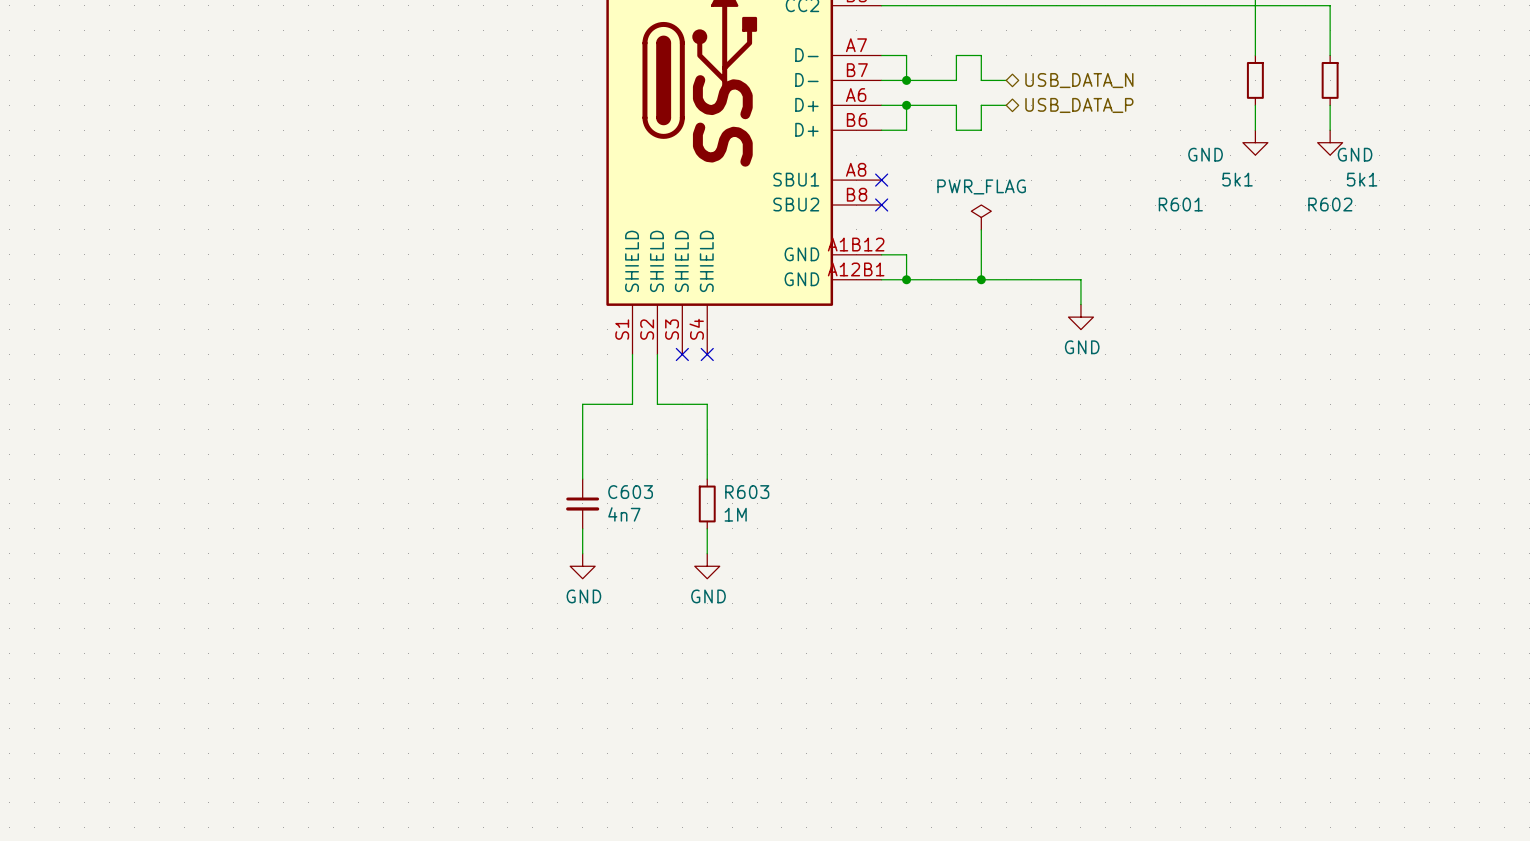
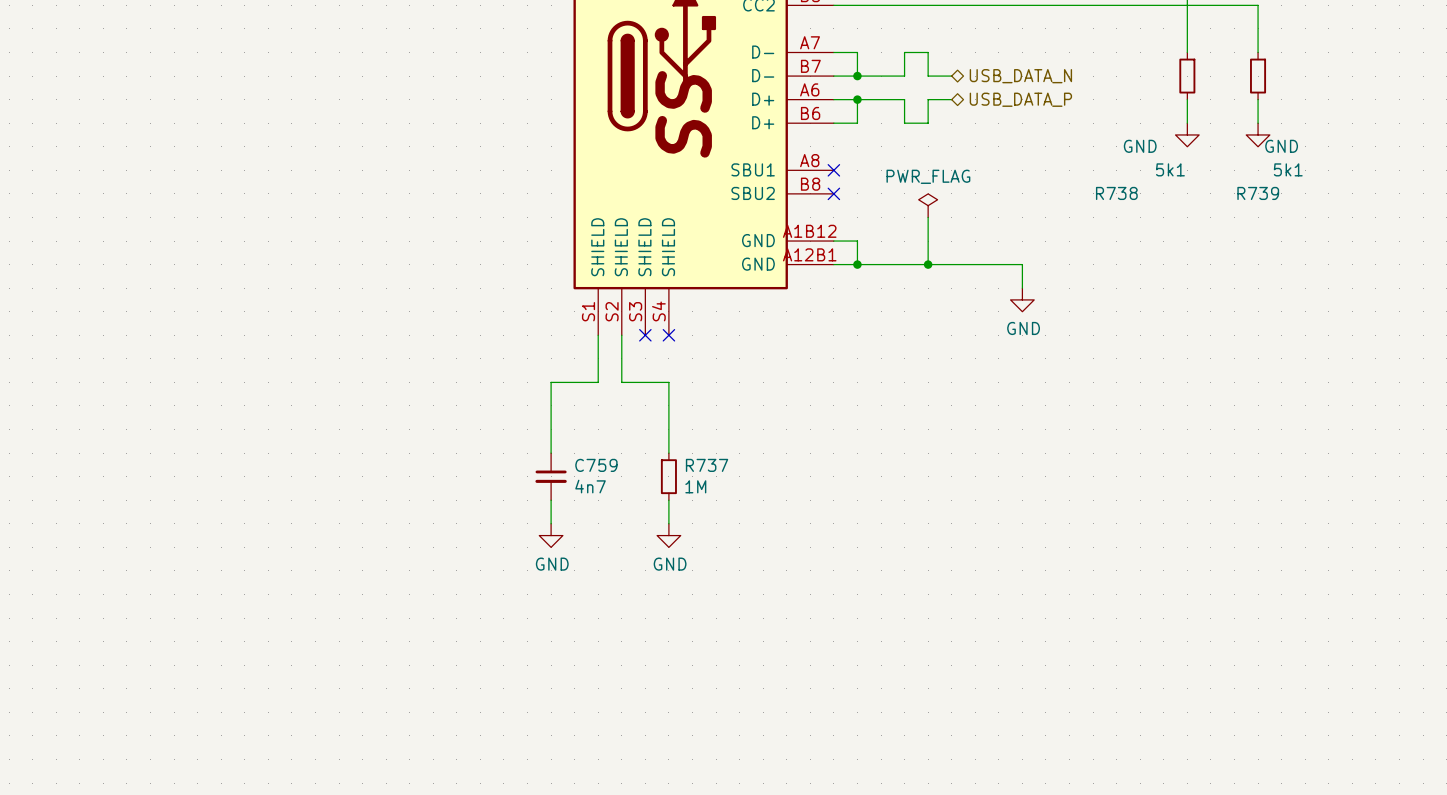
R601 name: R601 (1180, 204) -> R738 (1116, 193)
R602 name: R602 (1330, 204) -> R739 (1258, 193)
C603 name: C603 (630, 492) -> C759 (596, 465)
R603 name: R603 (747, 492) -> R737 (707, 465)

